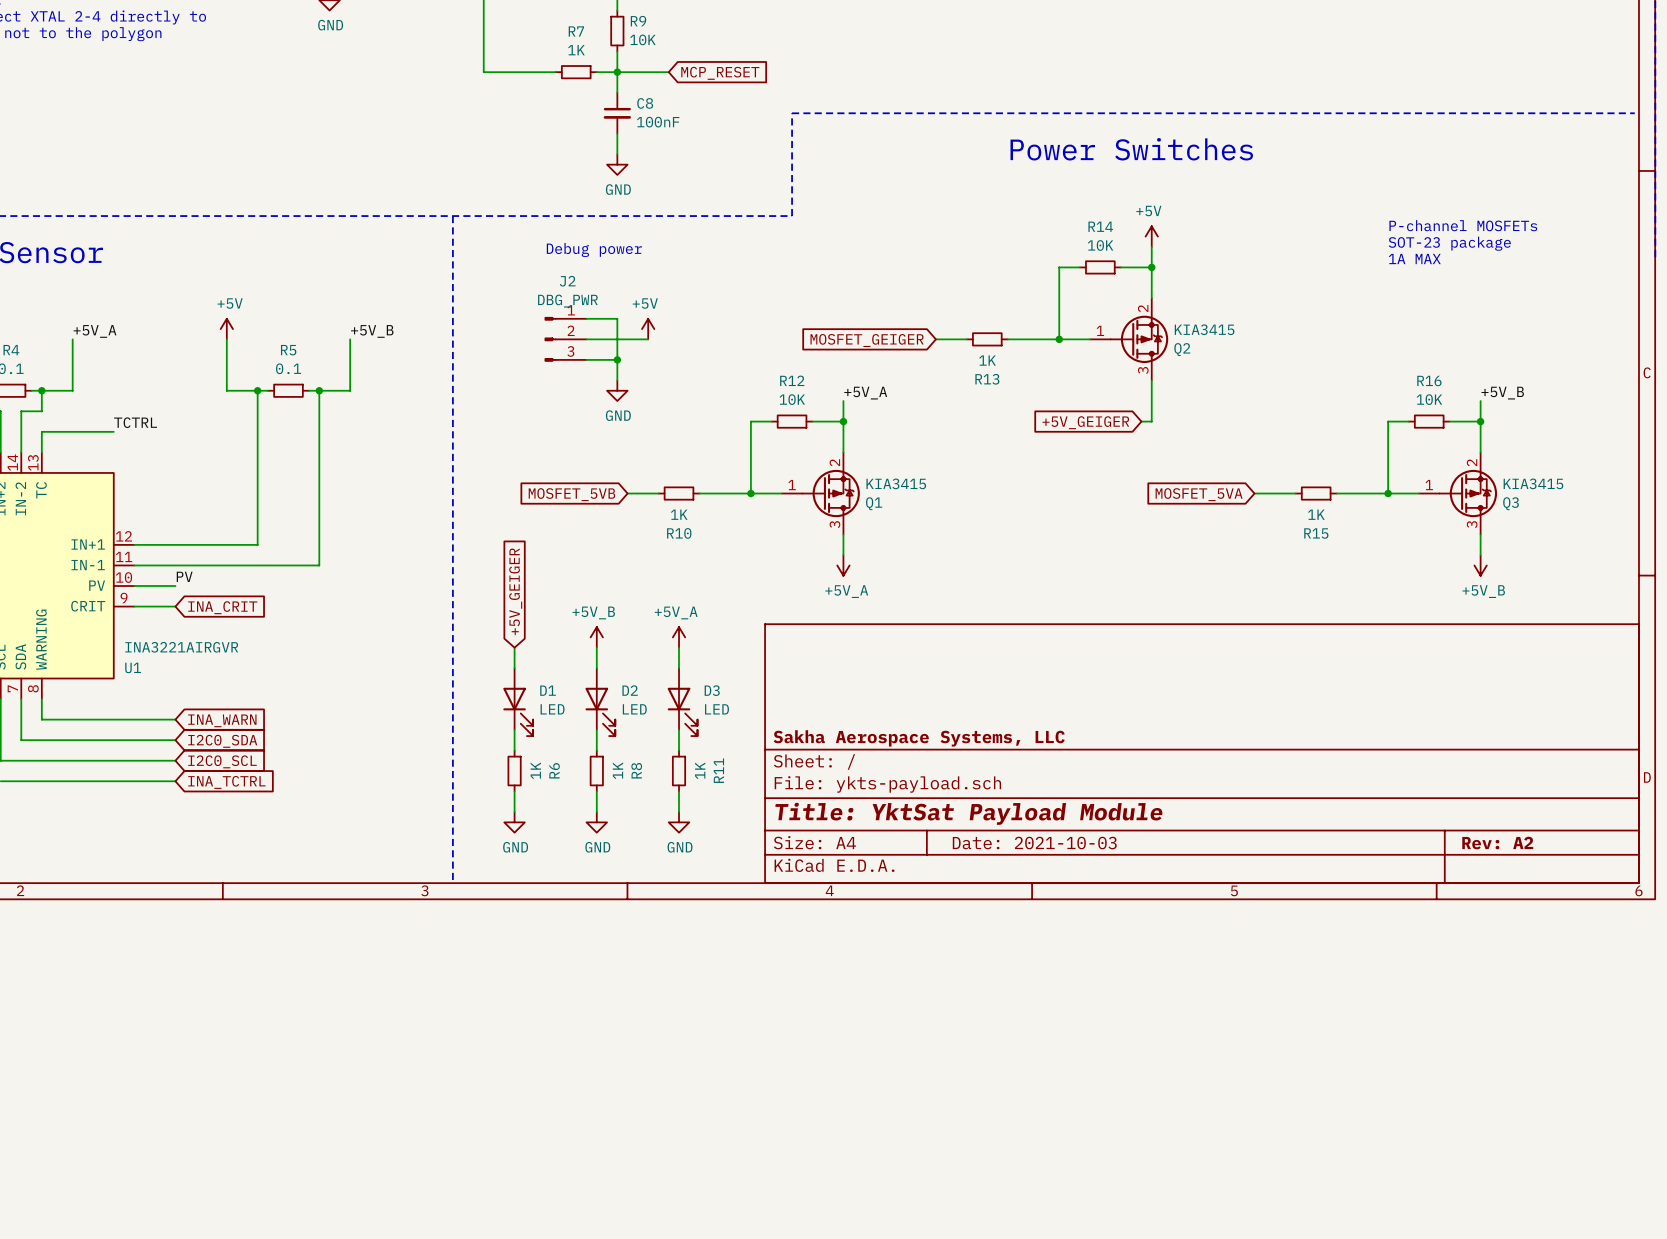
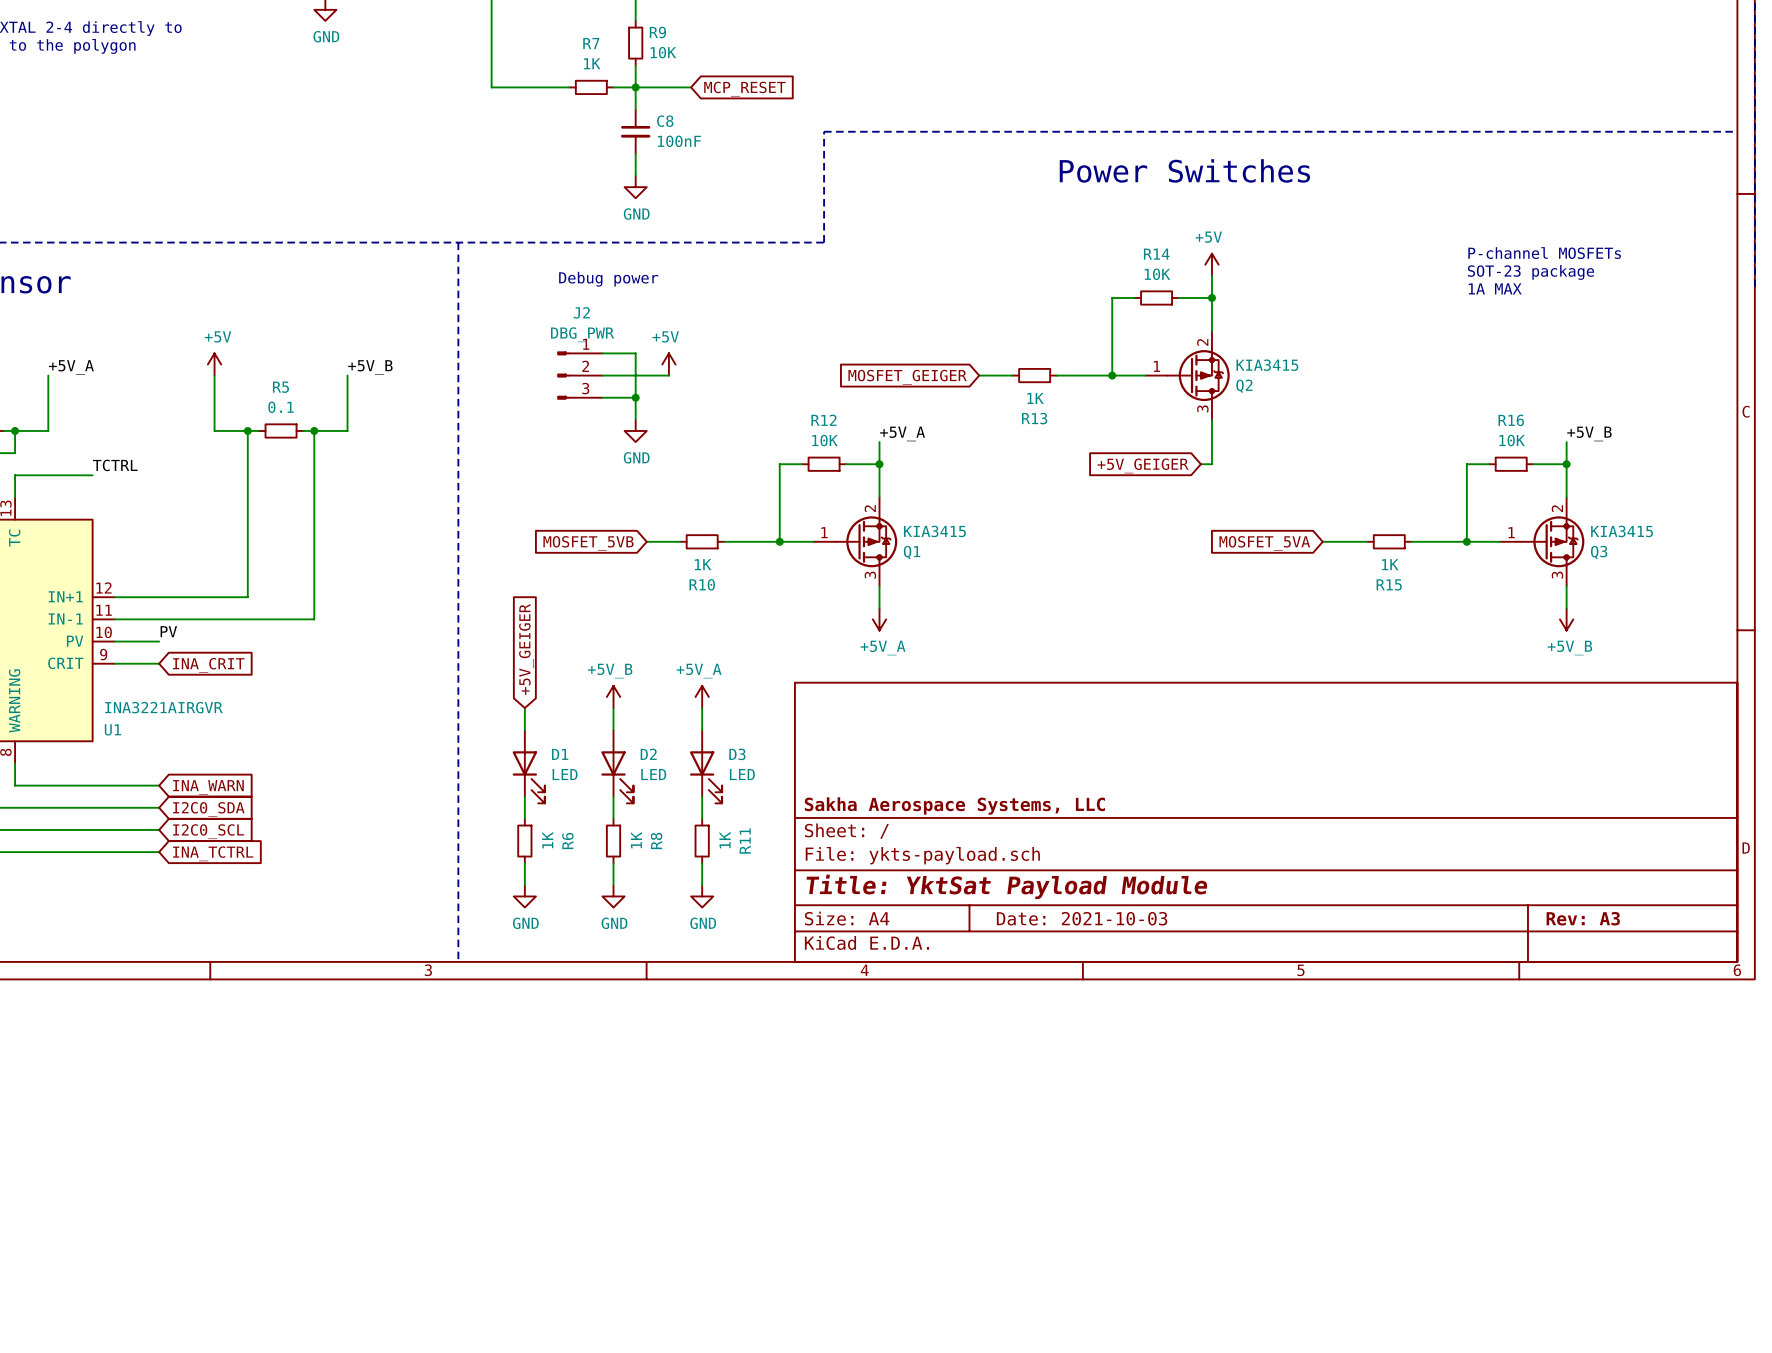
title block: Rev: A2 (1497, 843) -> Rev: A3 (1583, 918)

